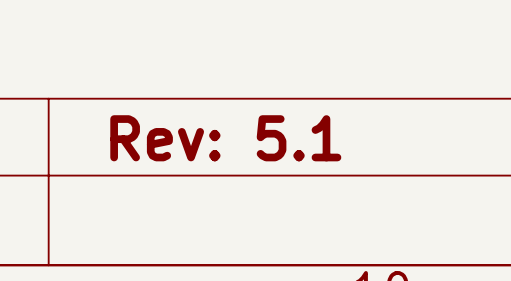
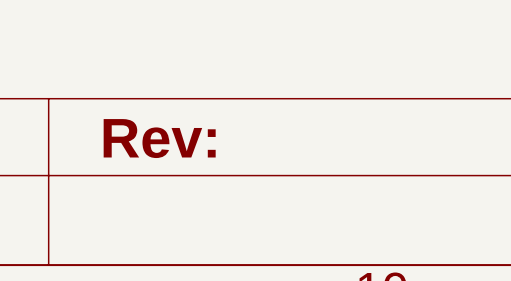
title block: Rev: 5.1 (225, 138) -> Rev: (159, 138)

